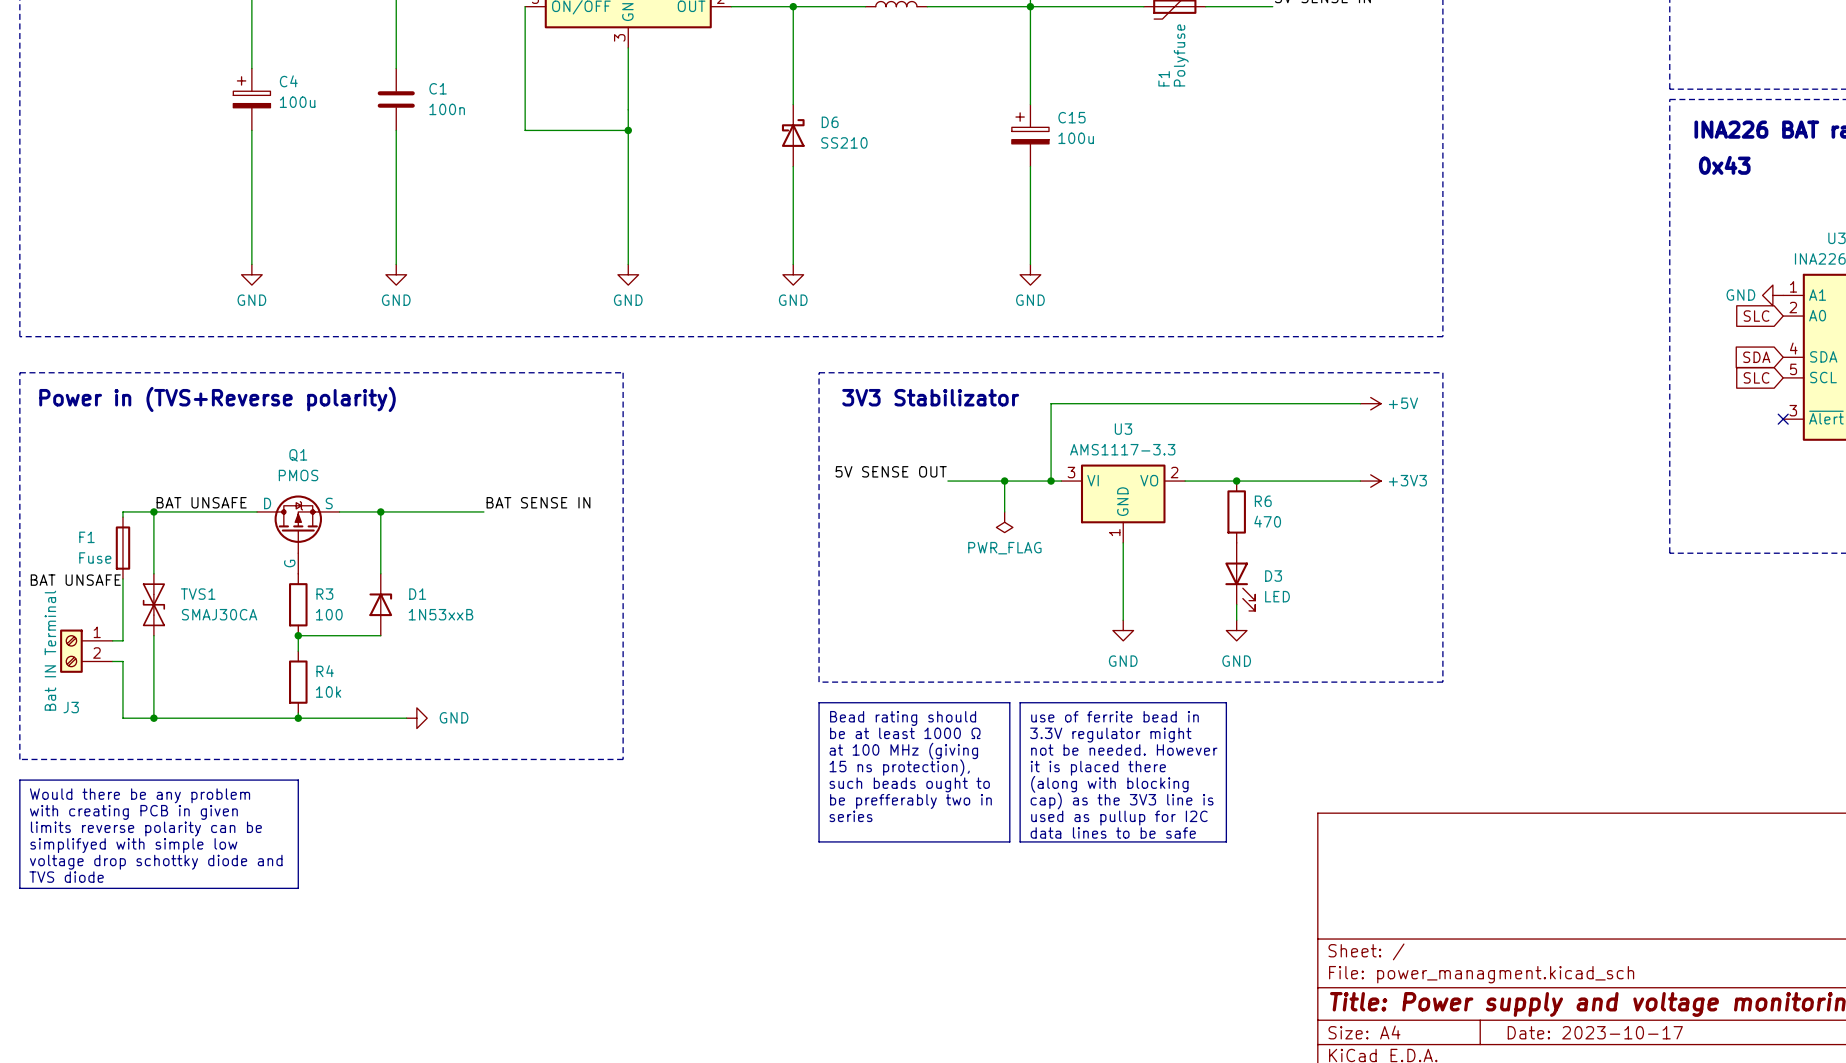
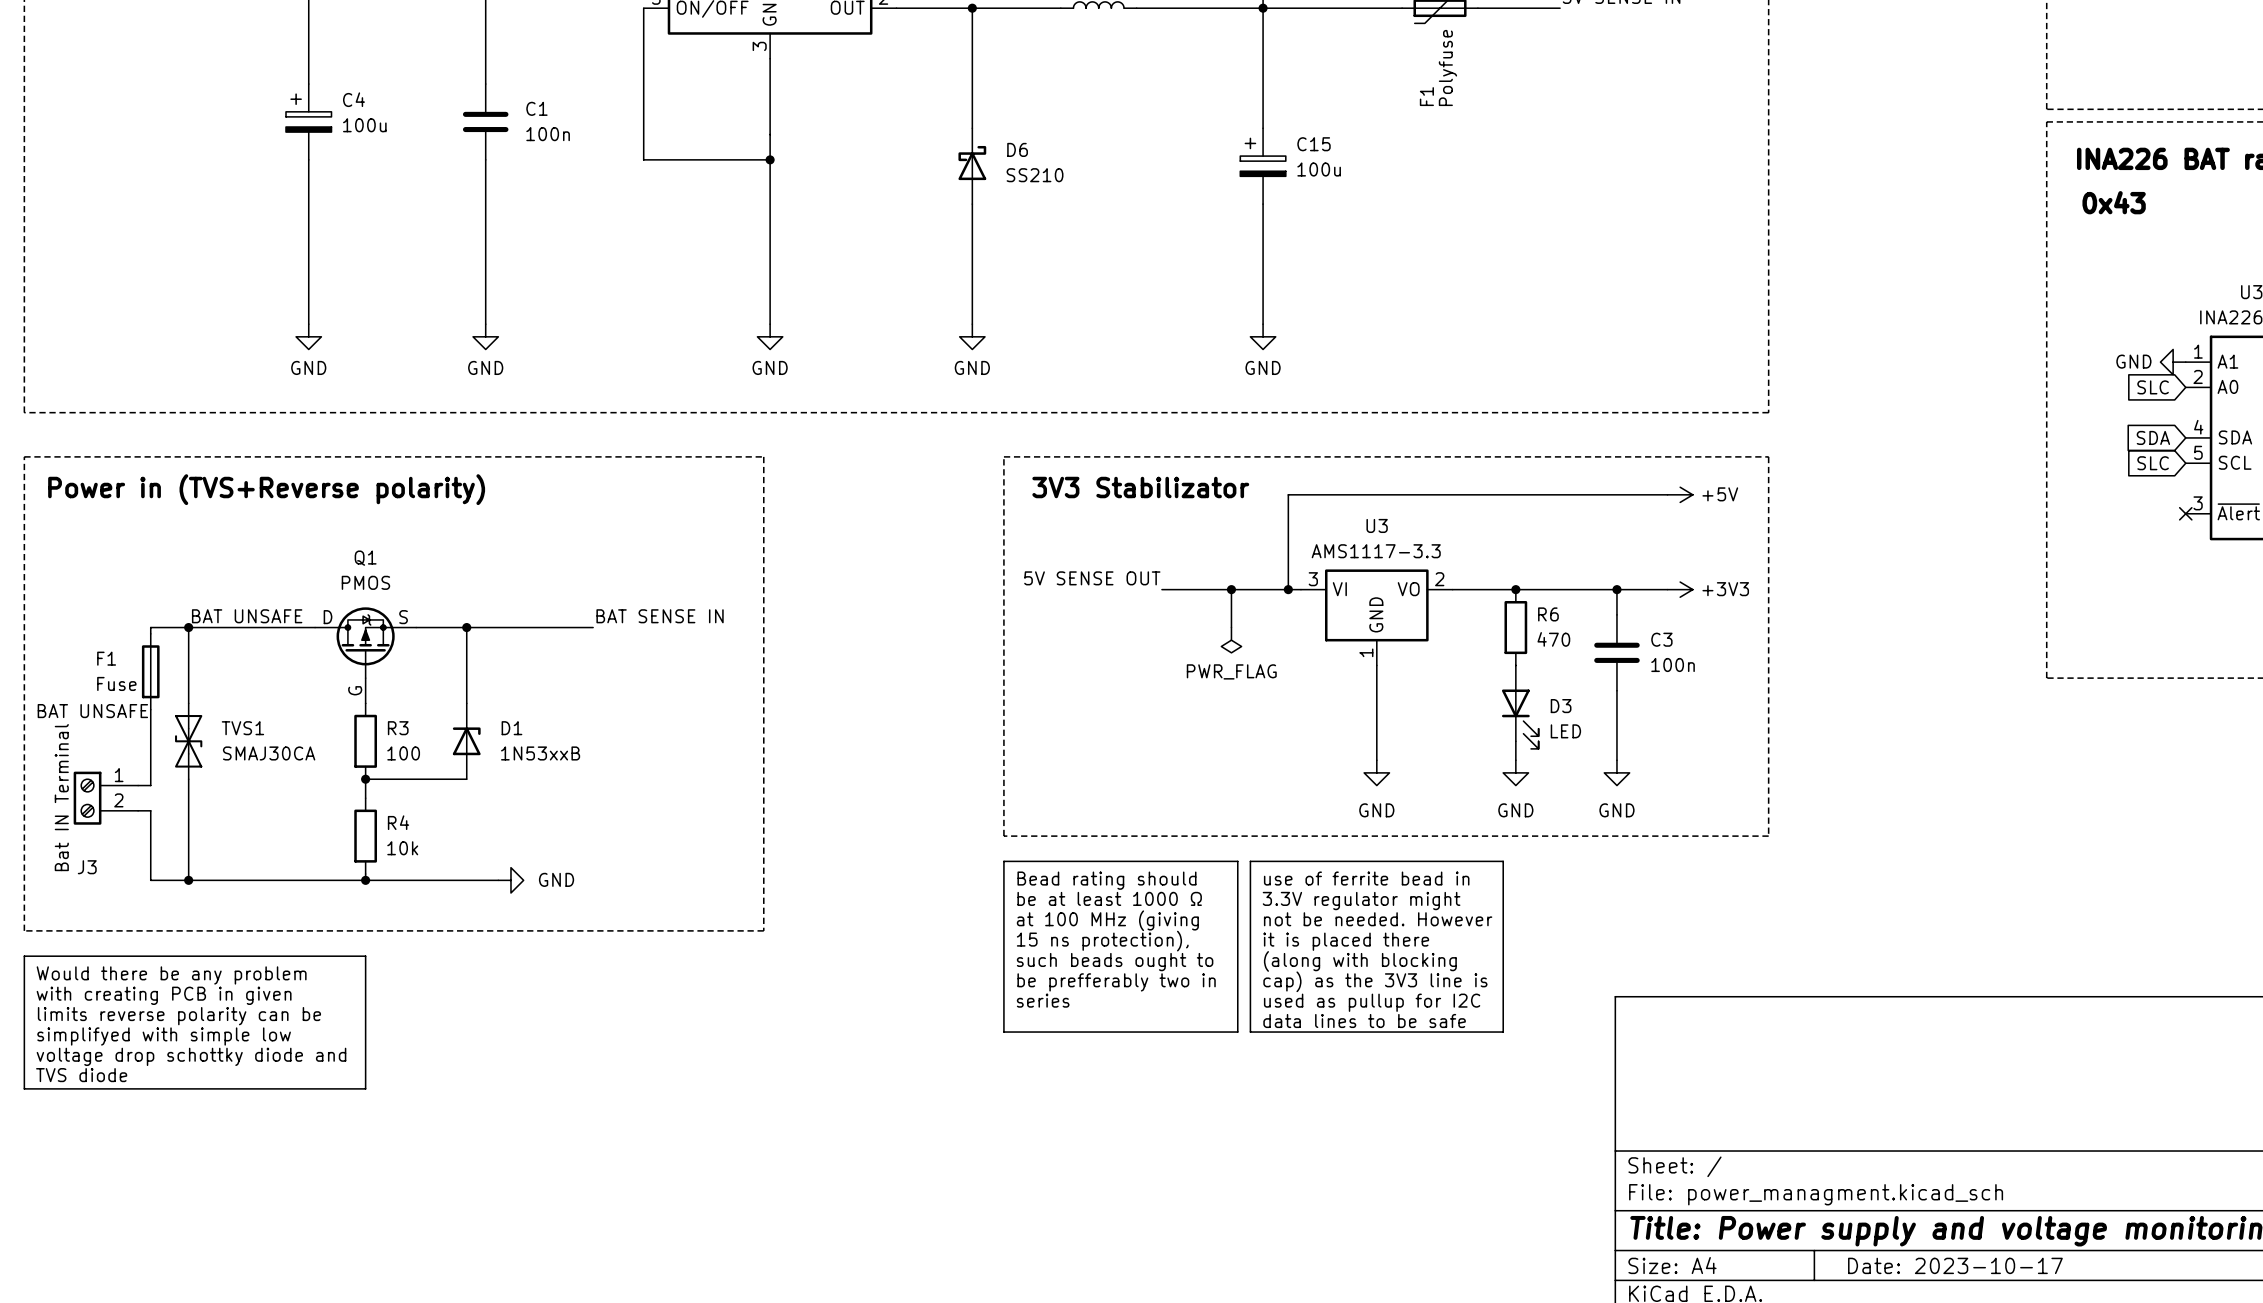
wire: none -> (1616, 589) (1616, 614)
junction: none -> (1616, 589)
C3: none -> 100n (1616, 652)
wire: none -> (1616, 690) (1616, 760)
power symbol: none -> GND (1616, 772)

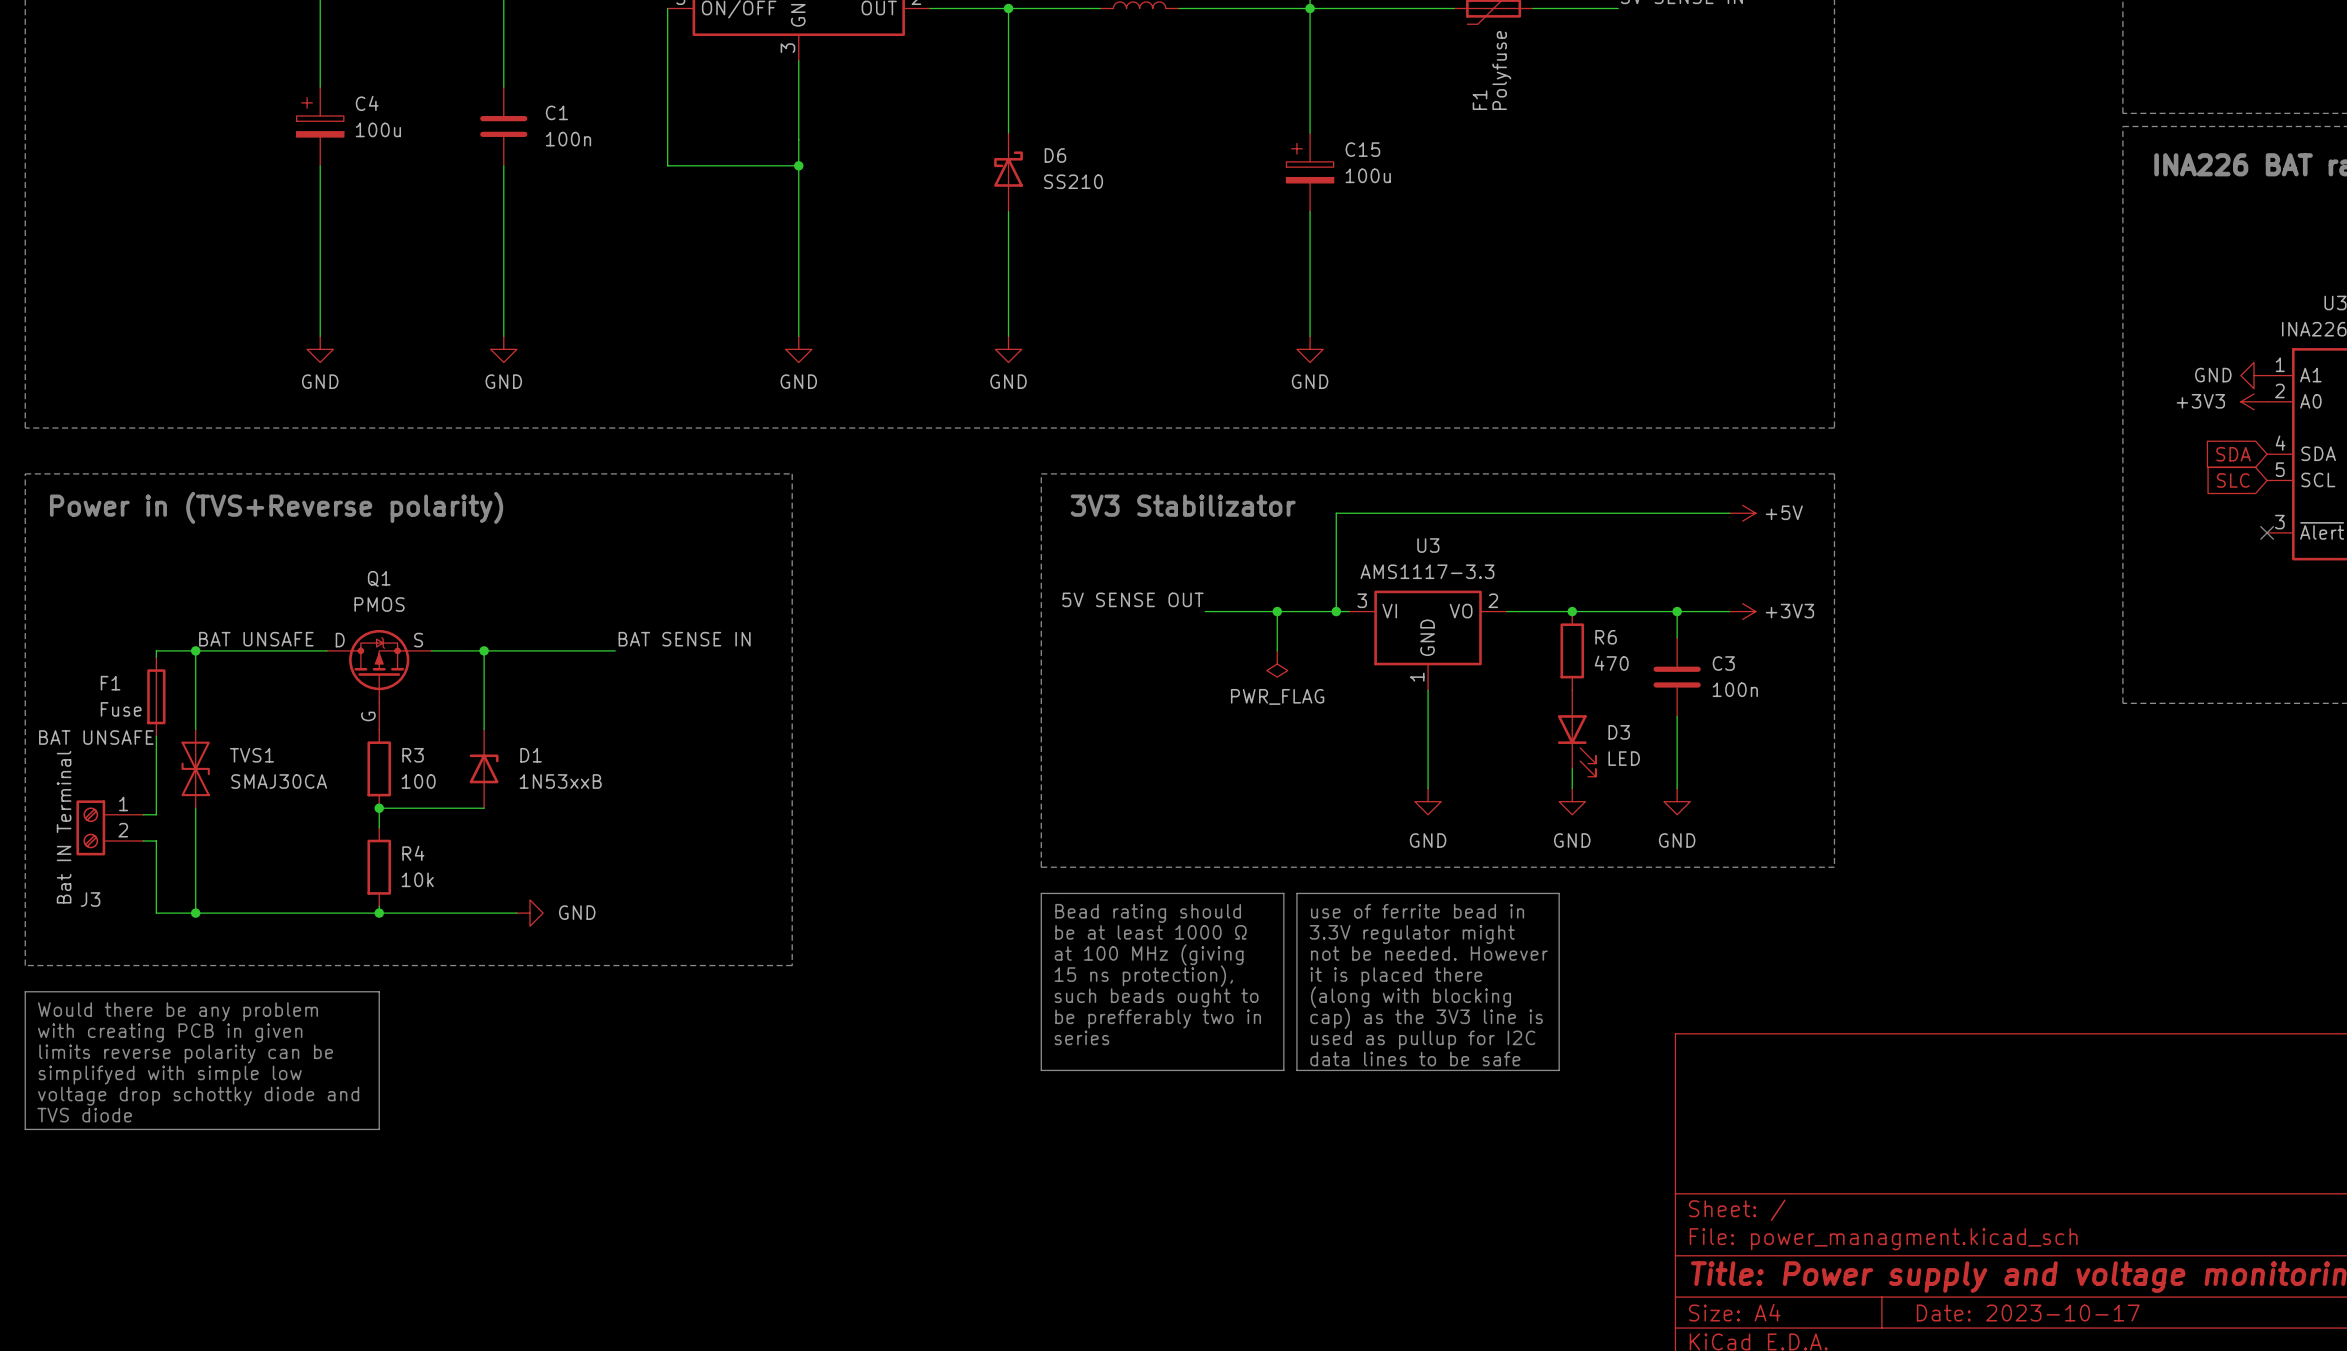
text: 0x43 (2114, 202) -> none
global label: SLC (2153, 387) -> none
power symbol: none -> +3V3 (2254, 401)

